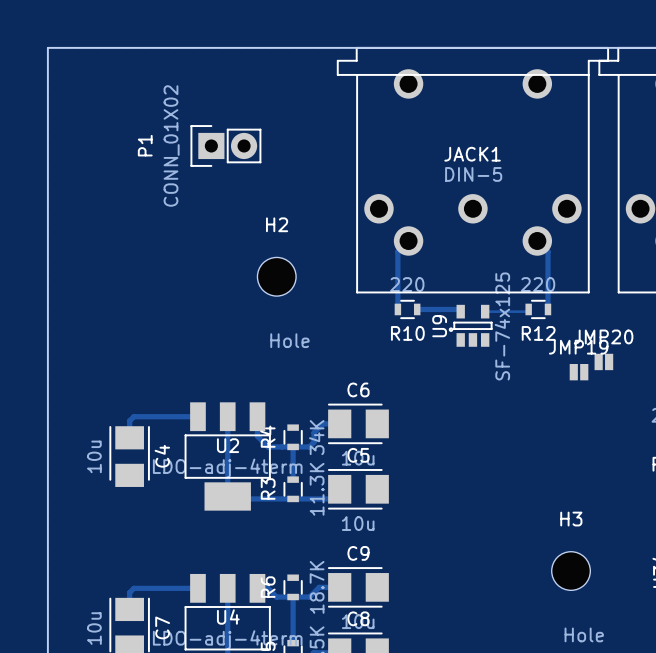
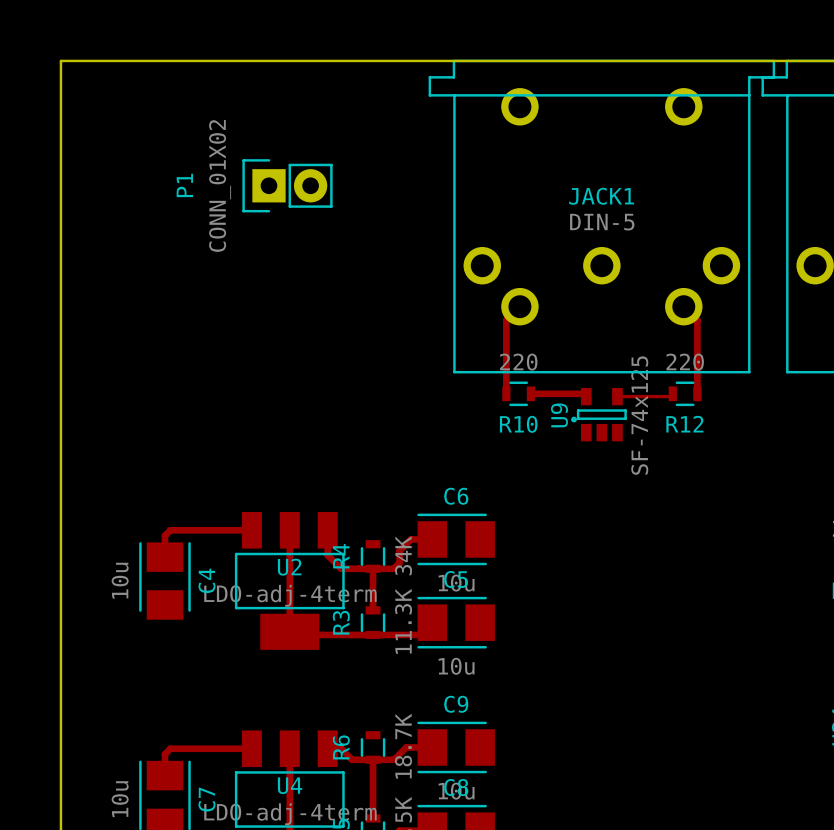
H2: Hole (276, 276) -> none
JMP20: (603, 361) -> none
JMP19: (579, 372) -> none
H3: Hole (571, 571) -> none

